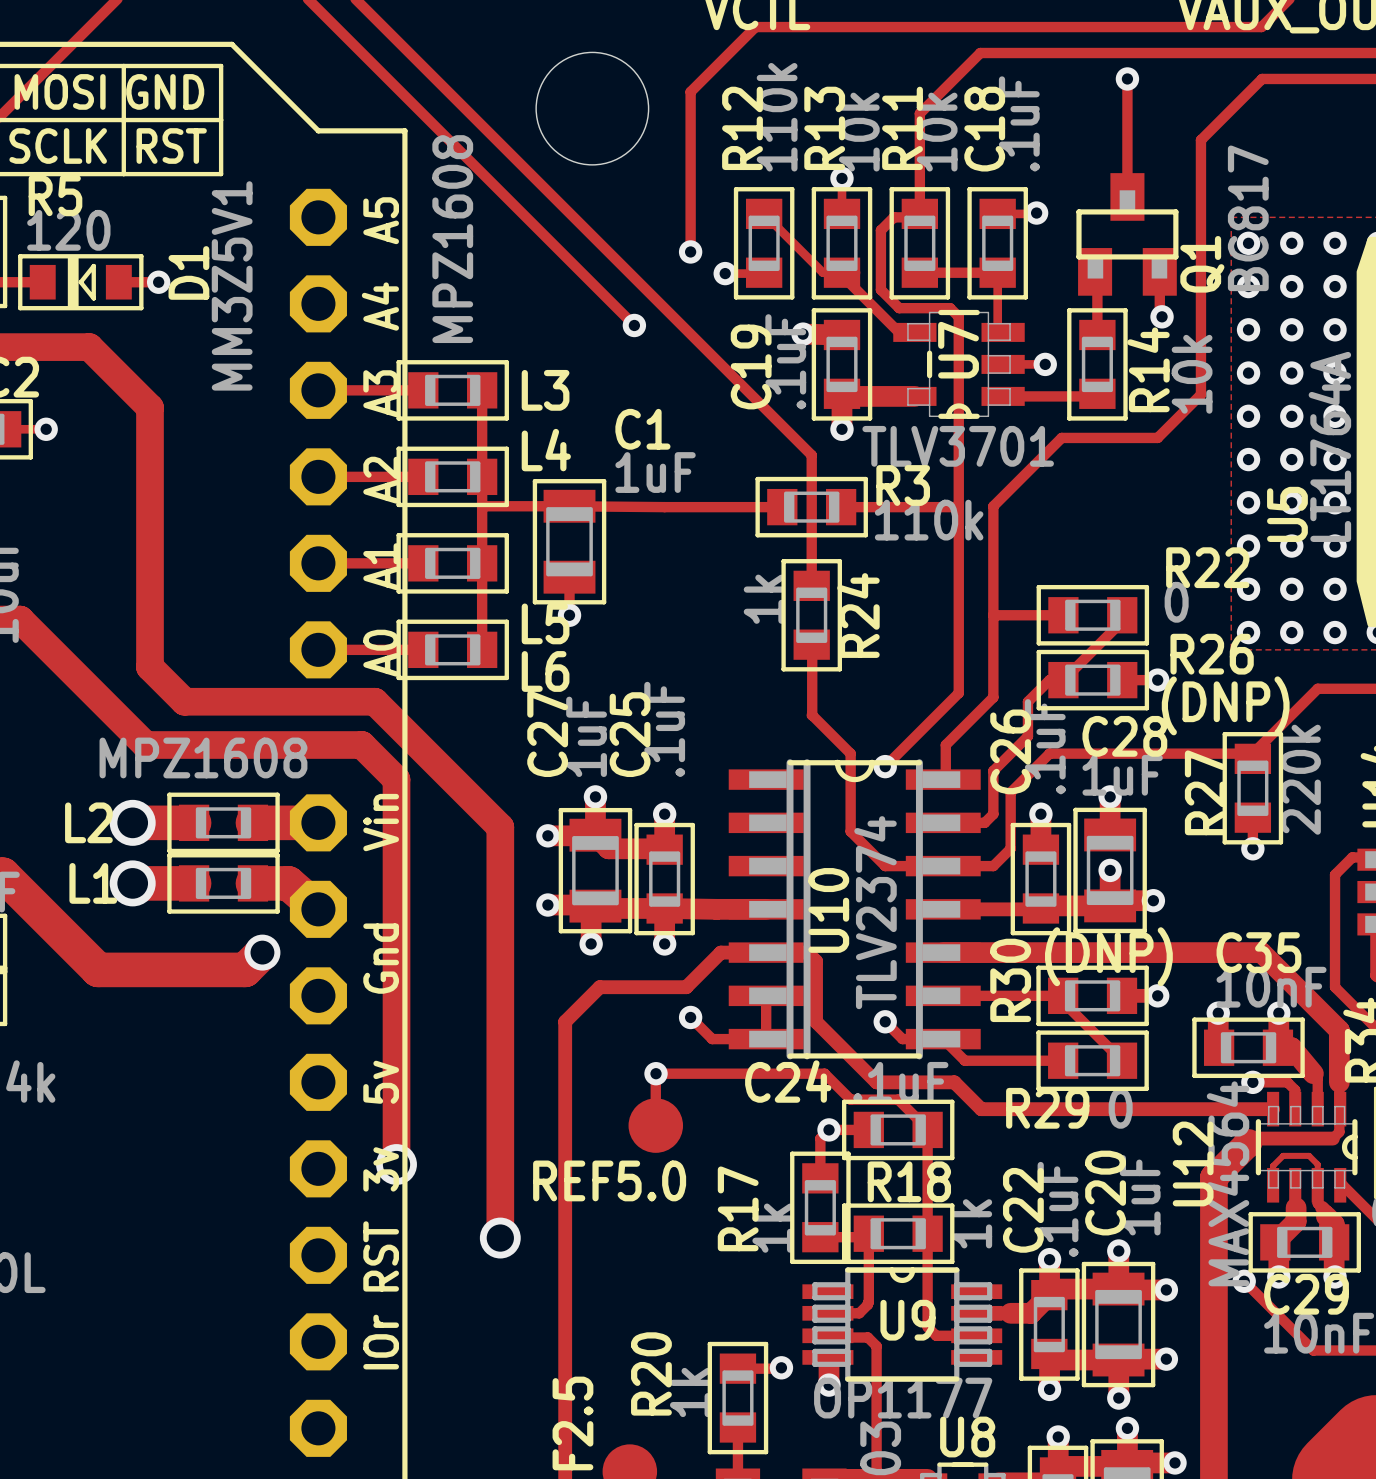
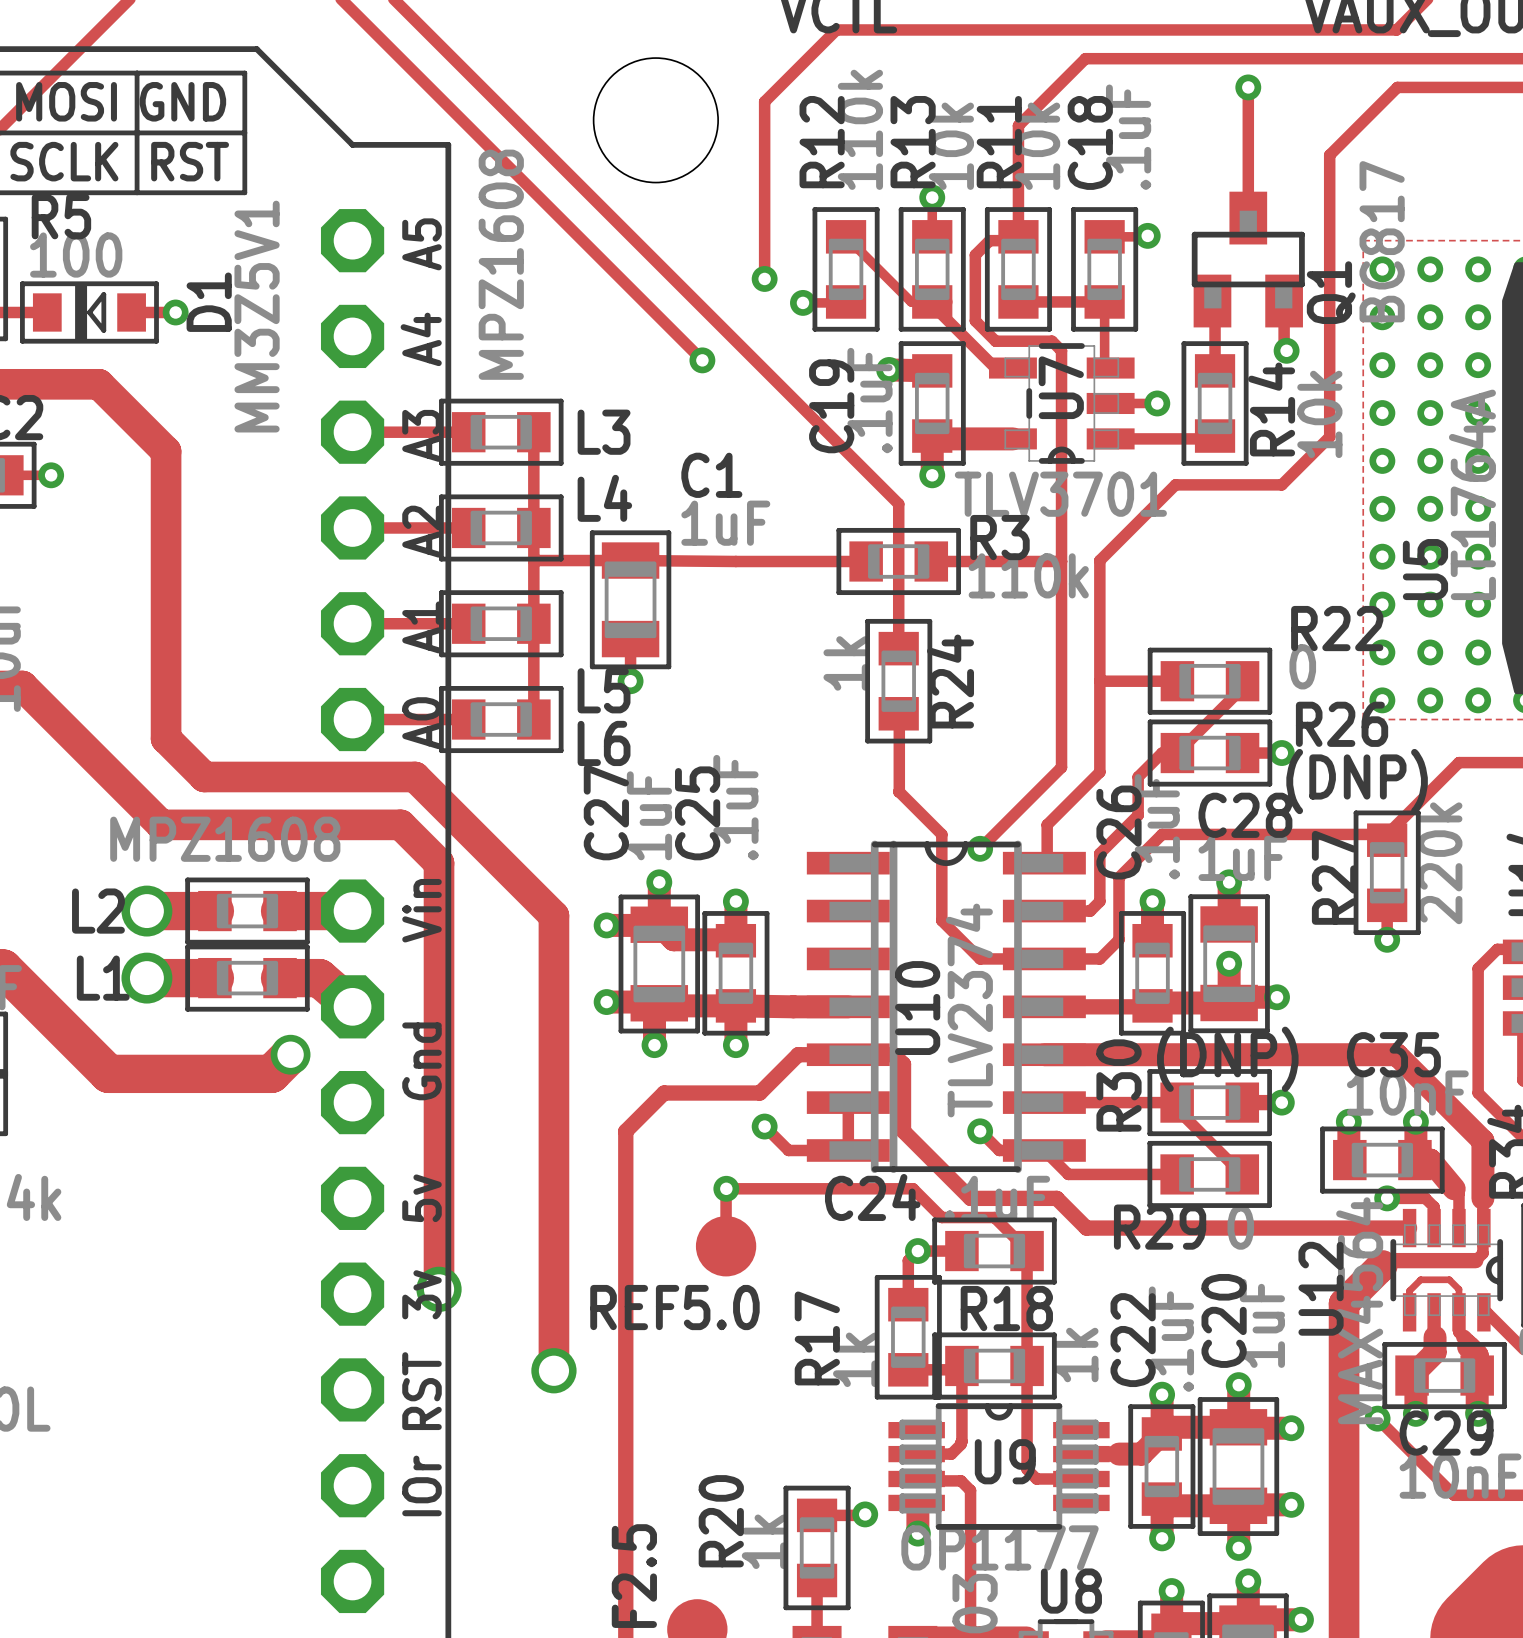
R5 value: 120 (68, 230) -> 100 (76, 255)

